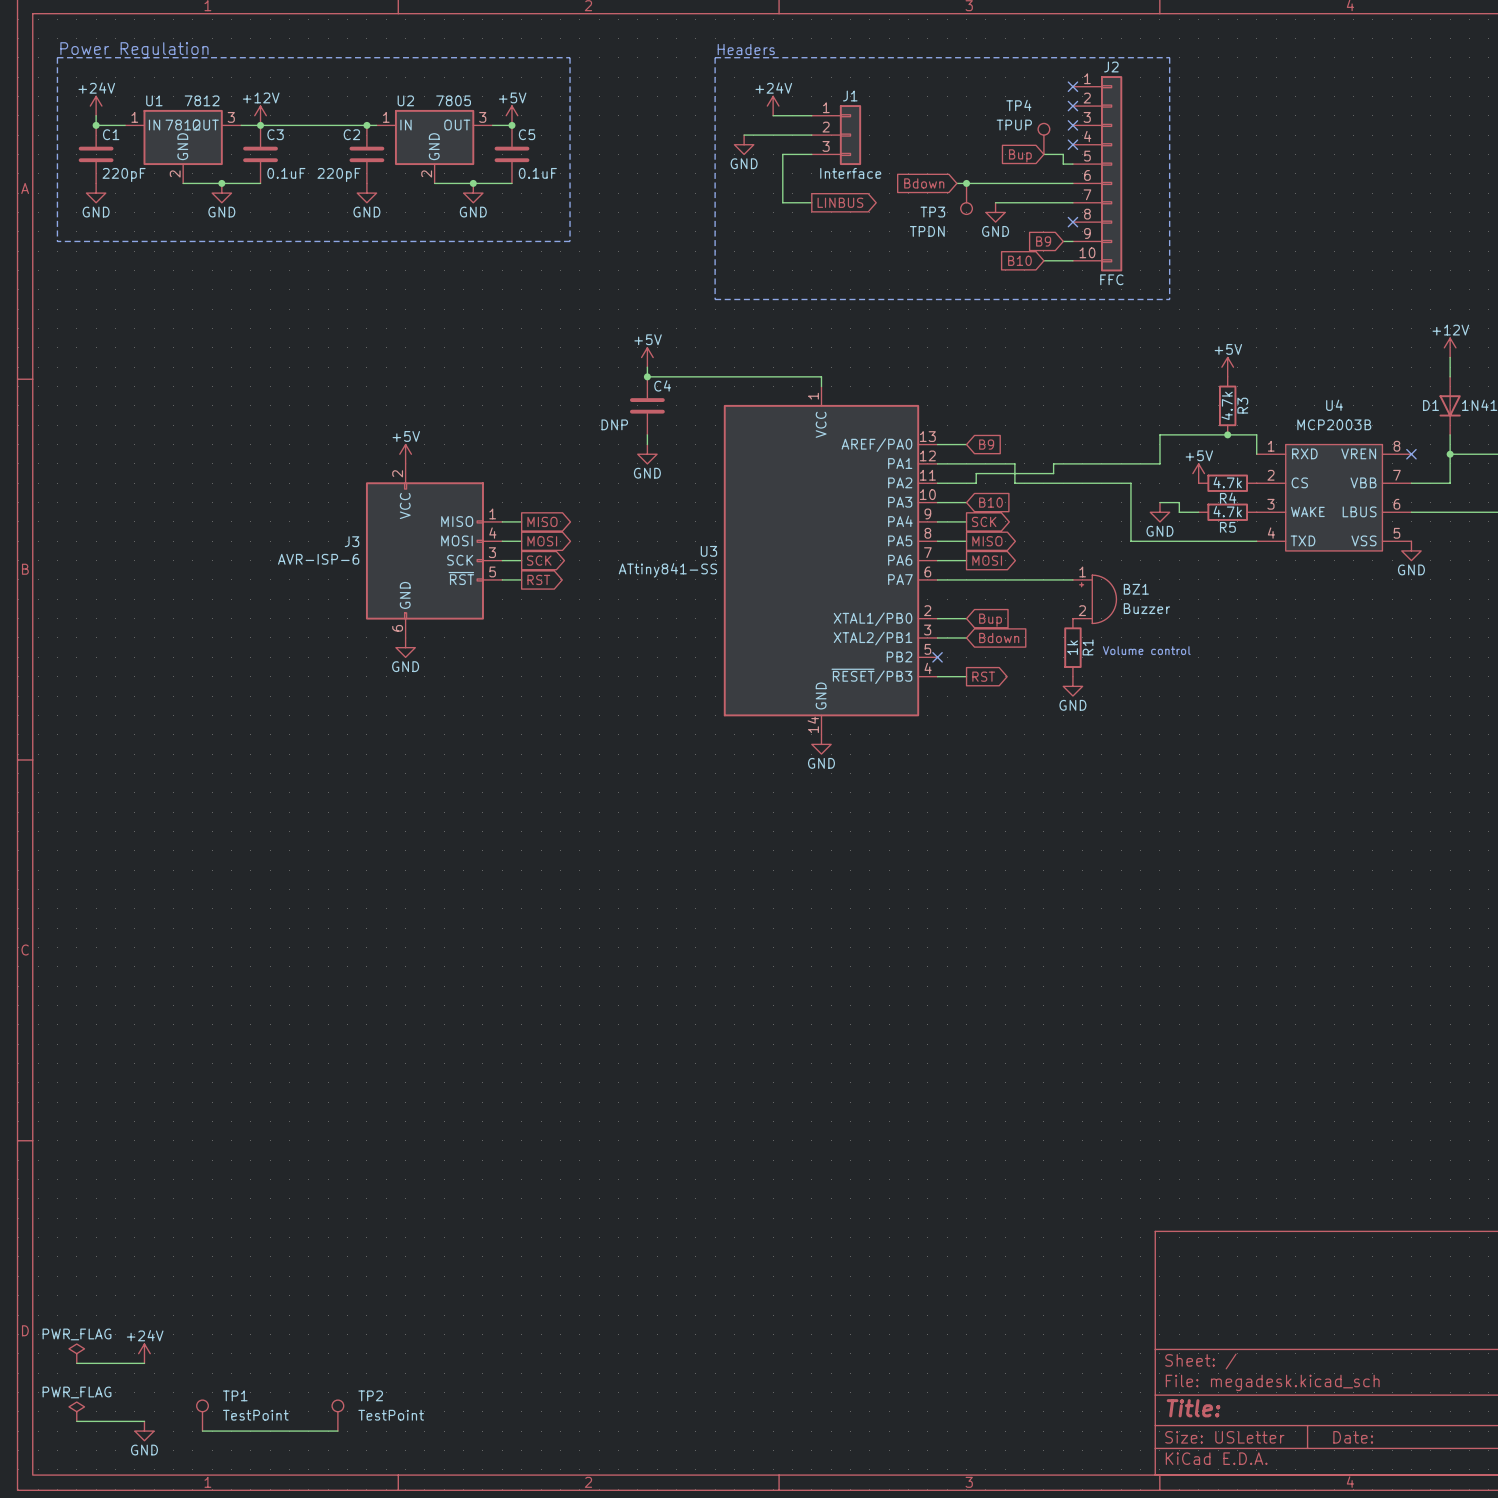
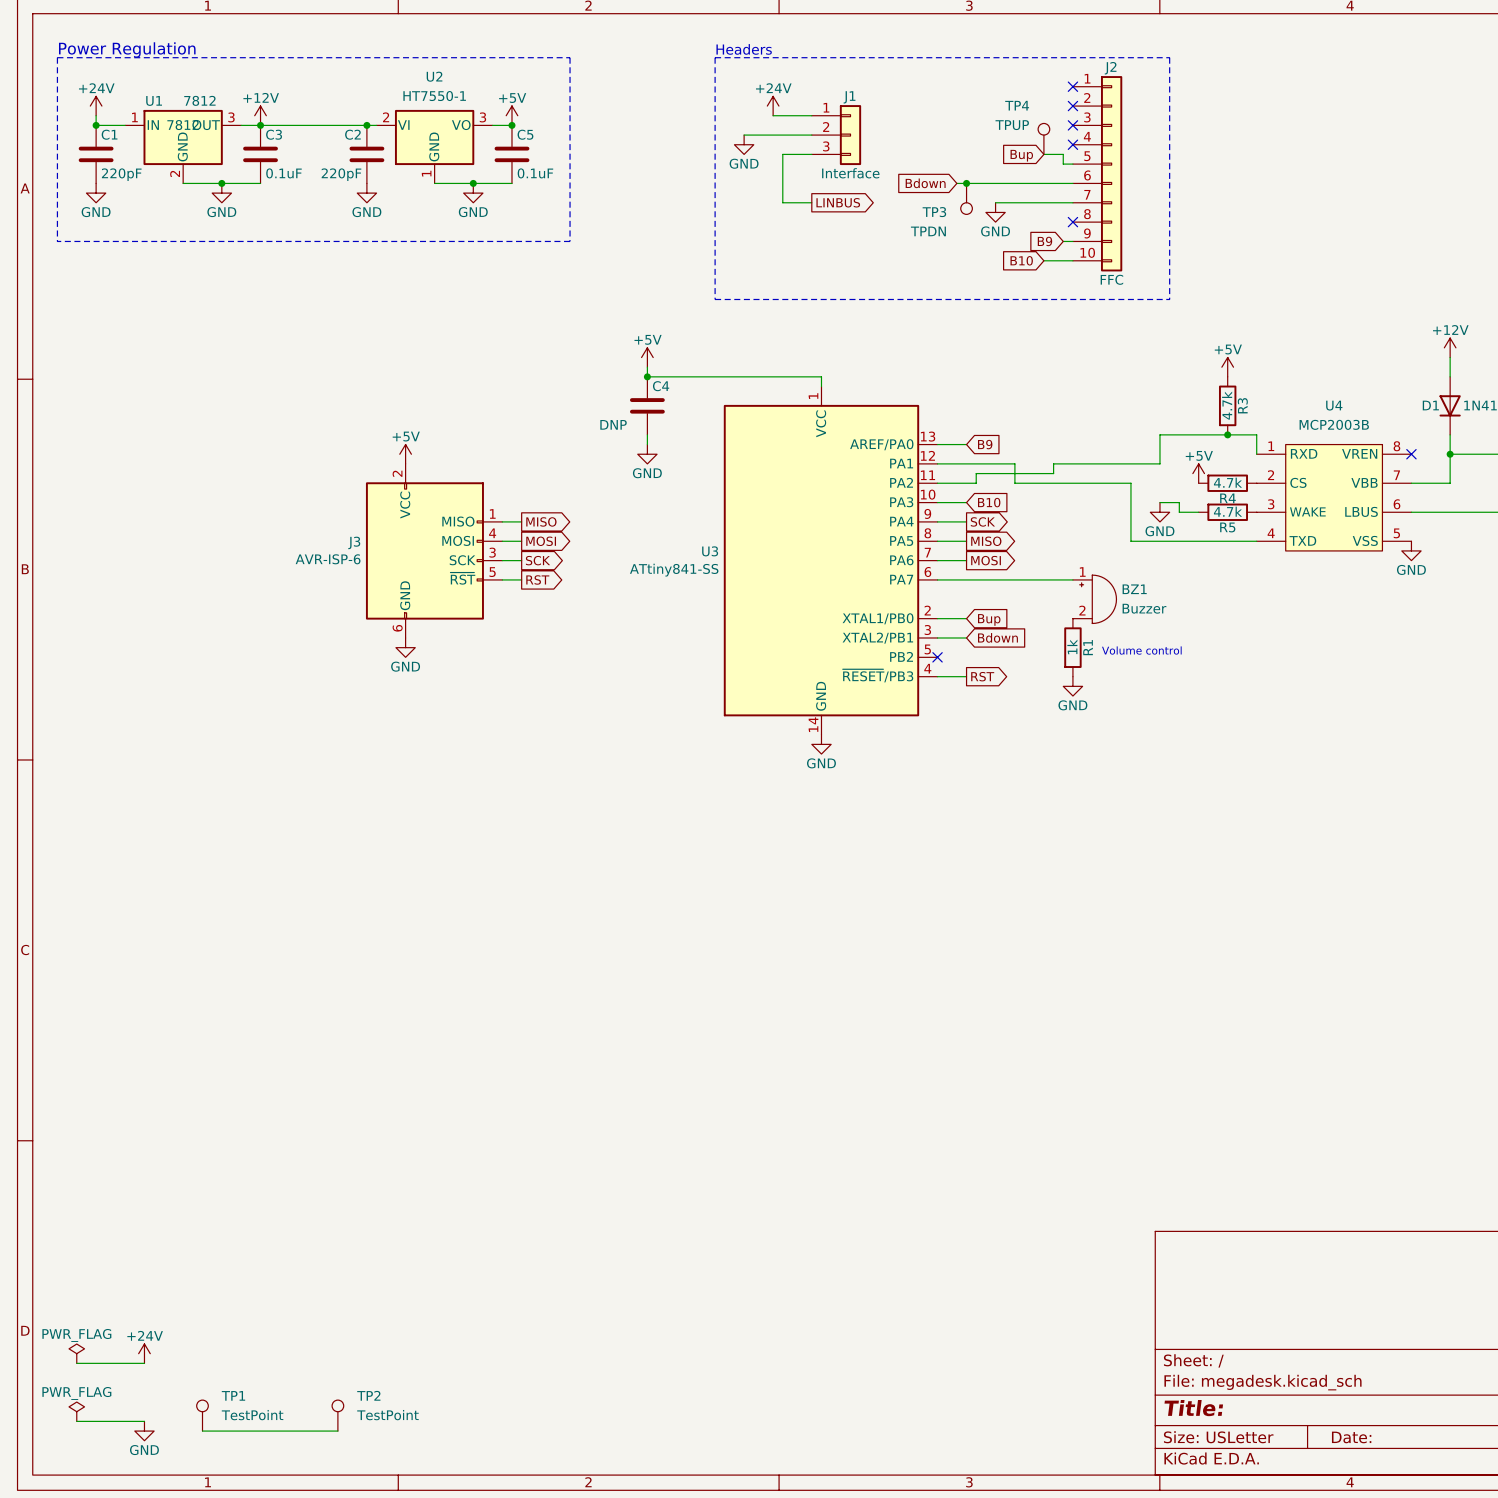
U2 name position: U2 (405, 100) -> U2 (434, 76)
U2 value: 7805 (453, 100) -> HT7550-1 (434, 96)
U2 pin number: 1 (386, 117) -> 2 (386, 117)
U2 pin name: IN (406, 125) -> VI (403, 125)
U2 pin name: OUT (457, 125) -> VO (461, 125)
U2 pin number: 2 (426, 173) -> 1 (426, 173)

